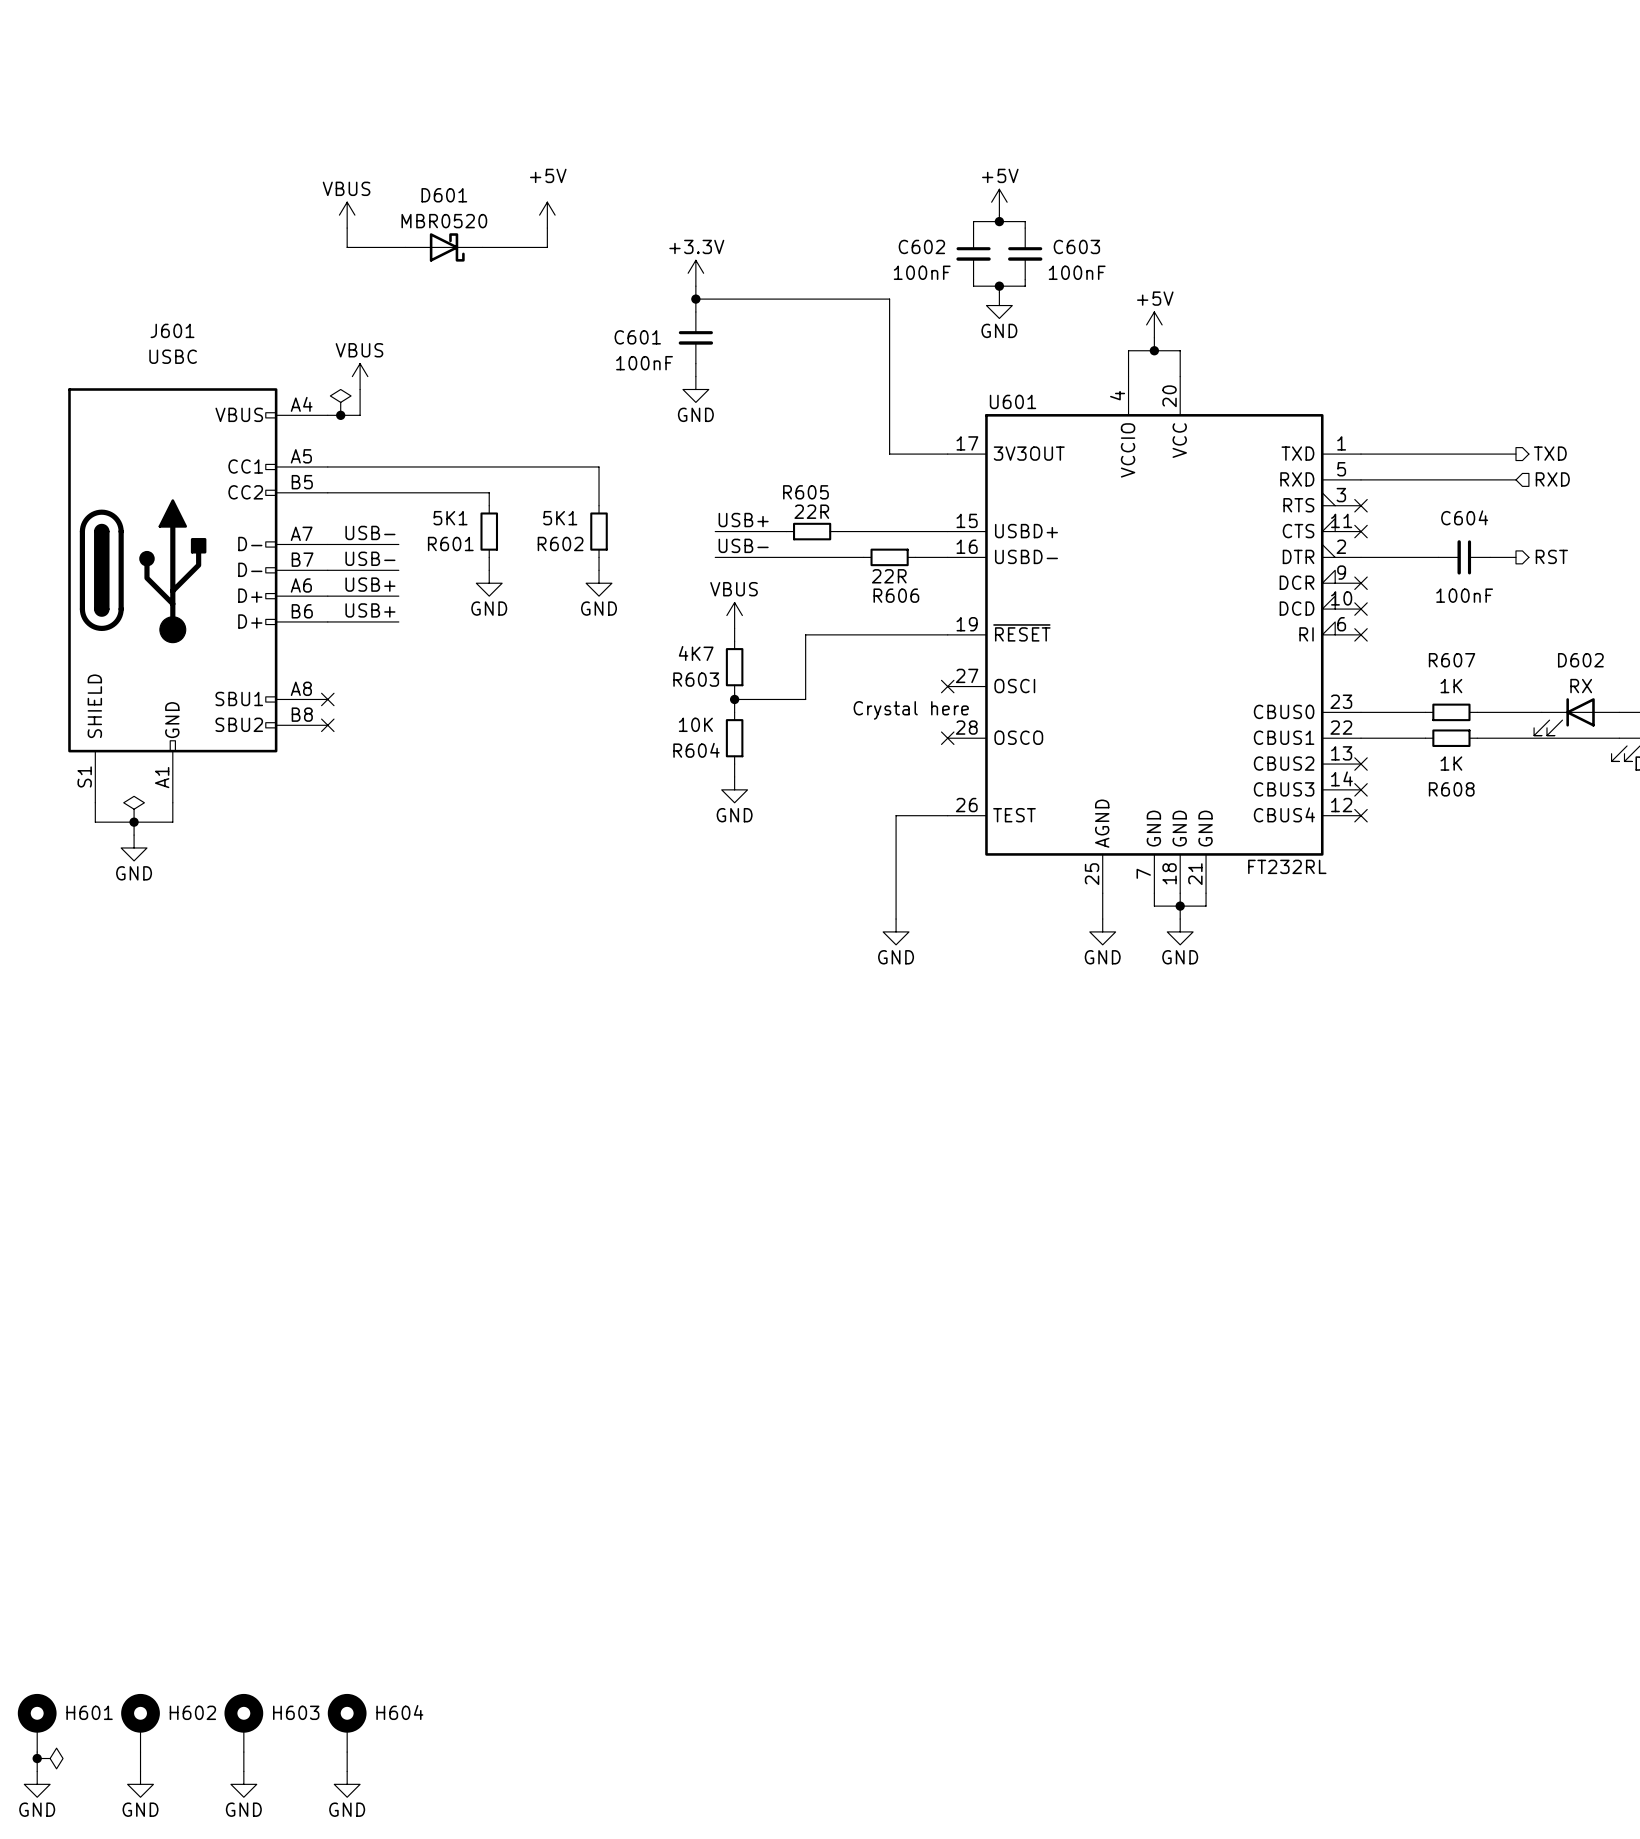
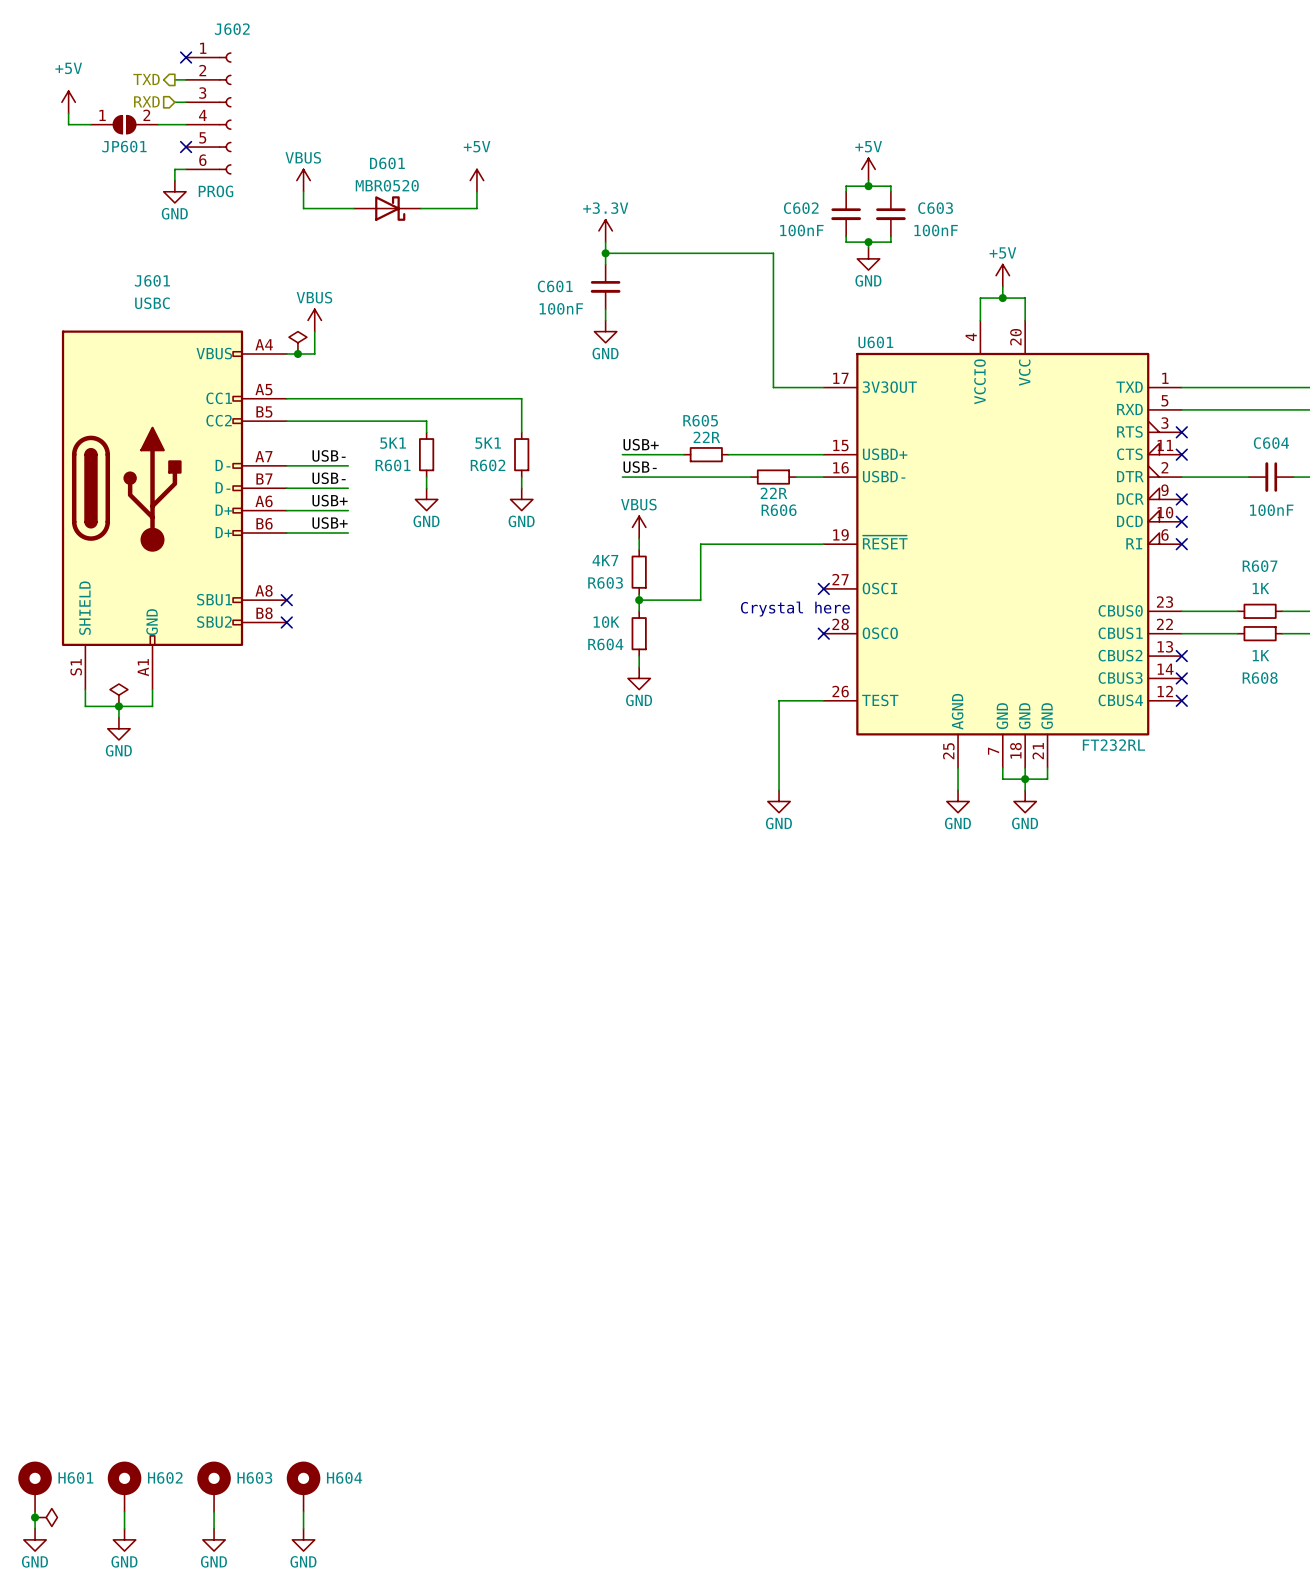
no-connect mark: none -> (186, 57)
hierarchical label: none -> TXD (146, 79)
wire: none -> (174, 79) (186, 79)
power symbol: none -> +5V (68, 102)
hierarchical label: none -> RXD (146, 101)
wire: none -> (174, 102) (186, 102)
wire: none -> (68, 113) (68, 124) (90, 124)
J602: none -> PROG (208, 113)
JP601: none -> (124, 124)
wire: none -> (158, 124) (186, 124)
no-connect mark: none -> (186, 147)
wire: none -> (186, 169) (174, 169) (174, 180)
power symbol: none -> GND (174, 191)

